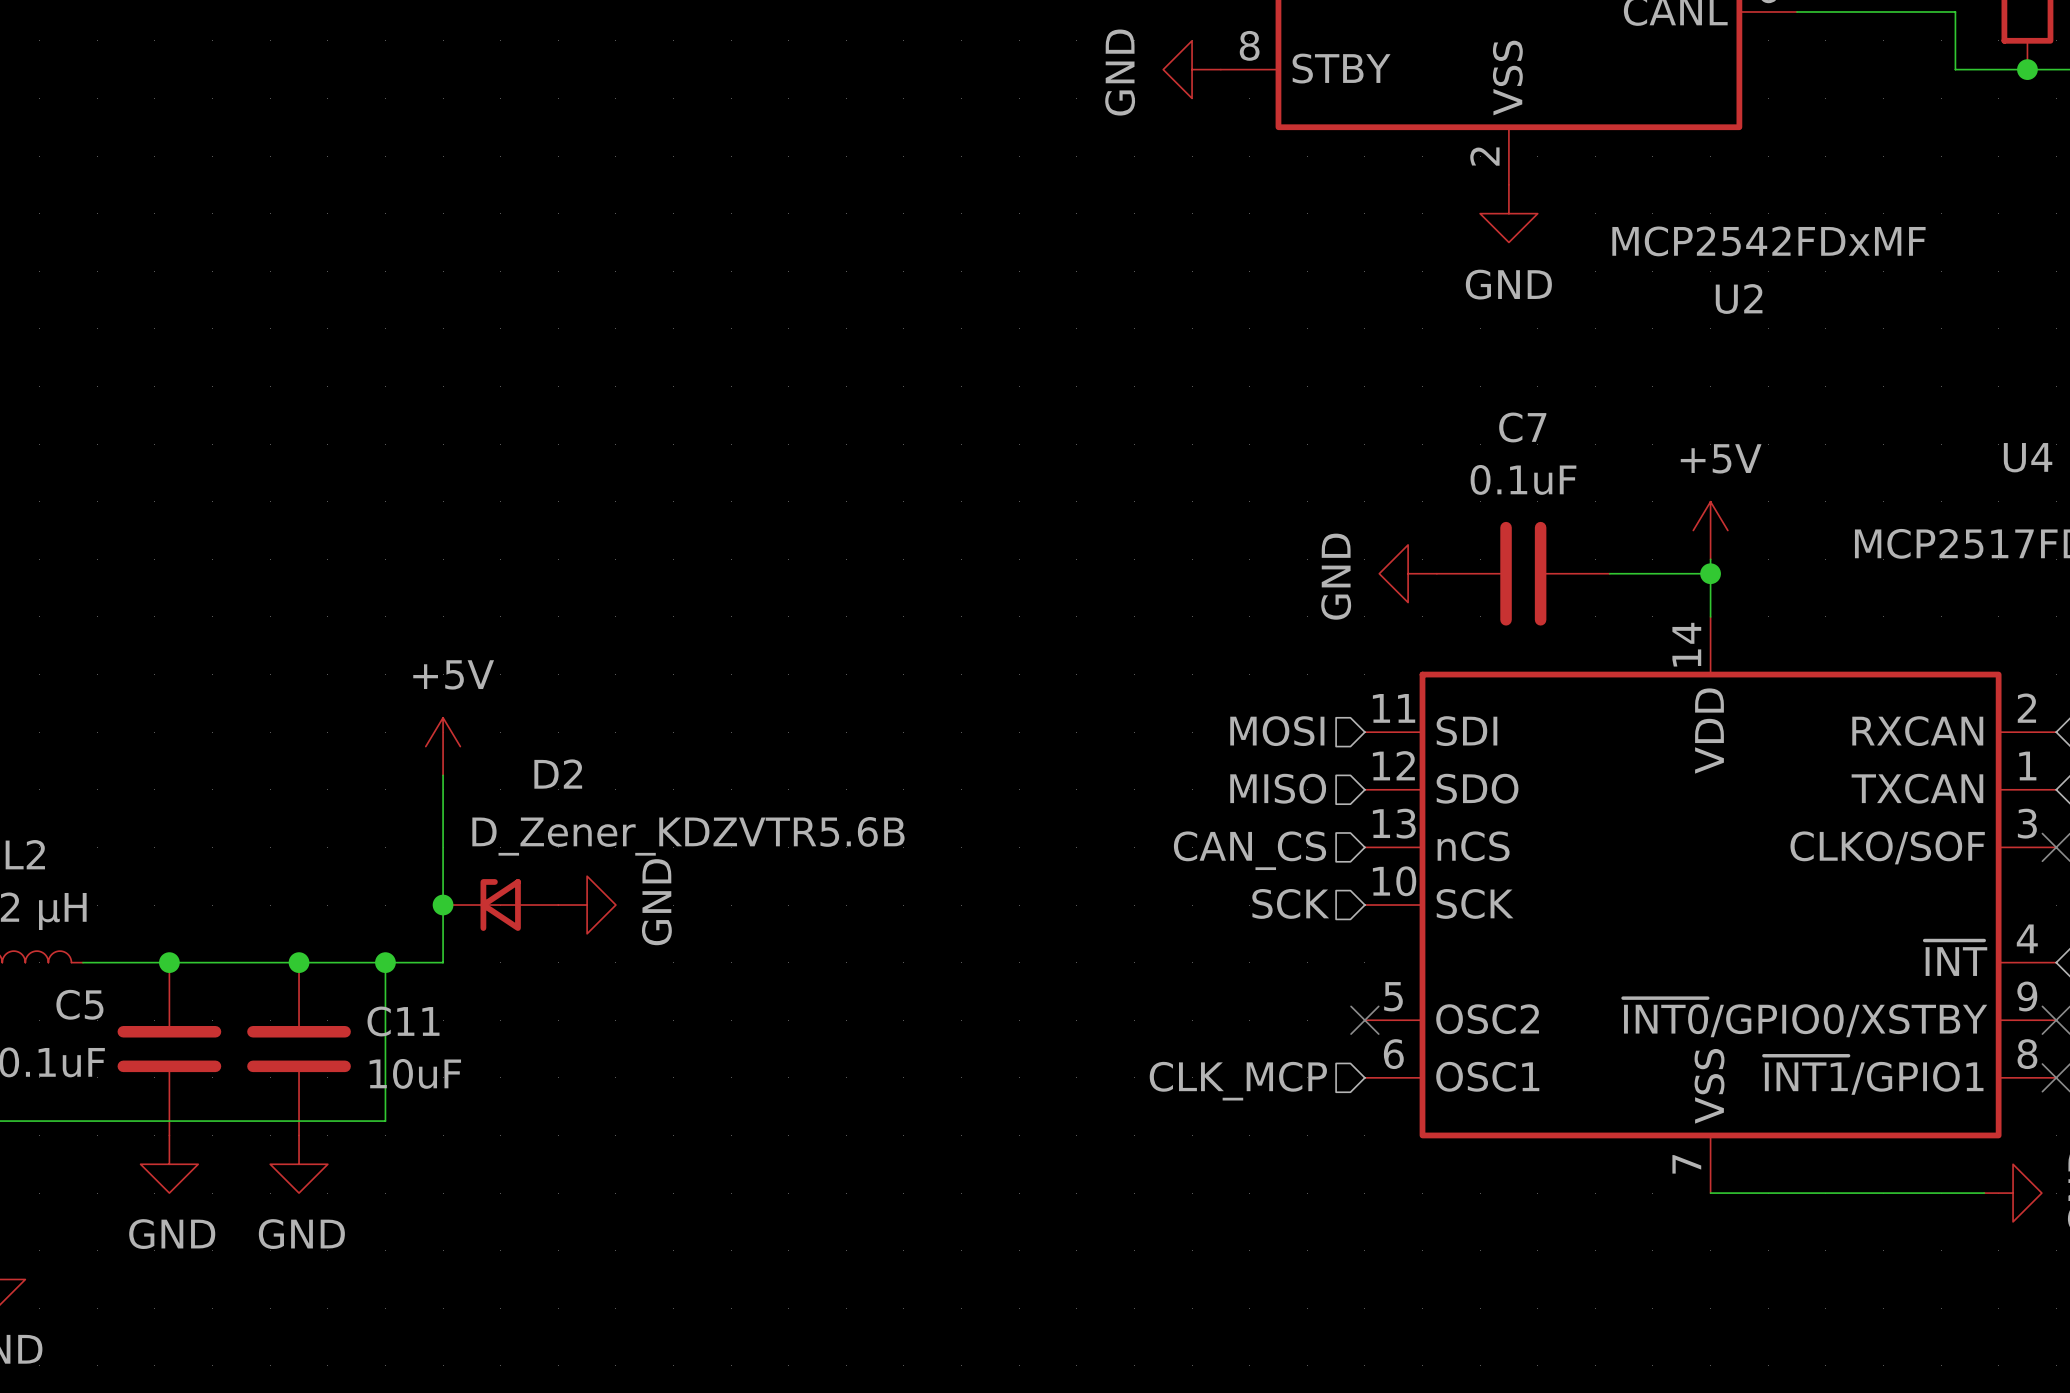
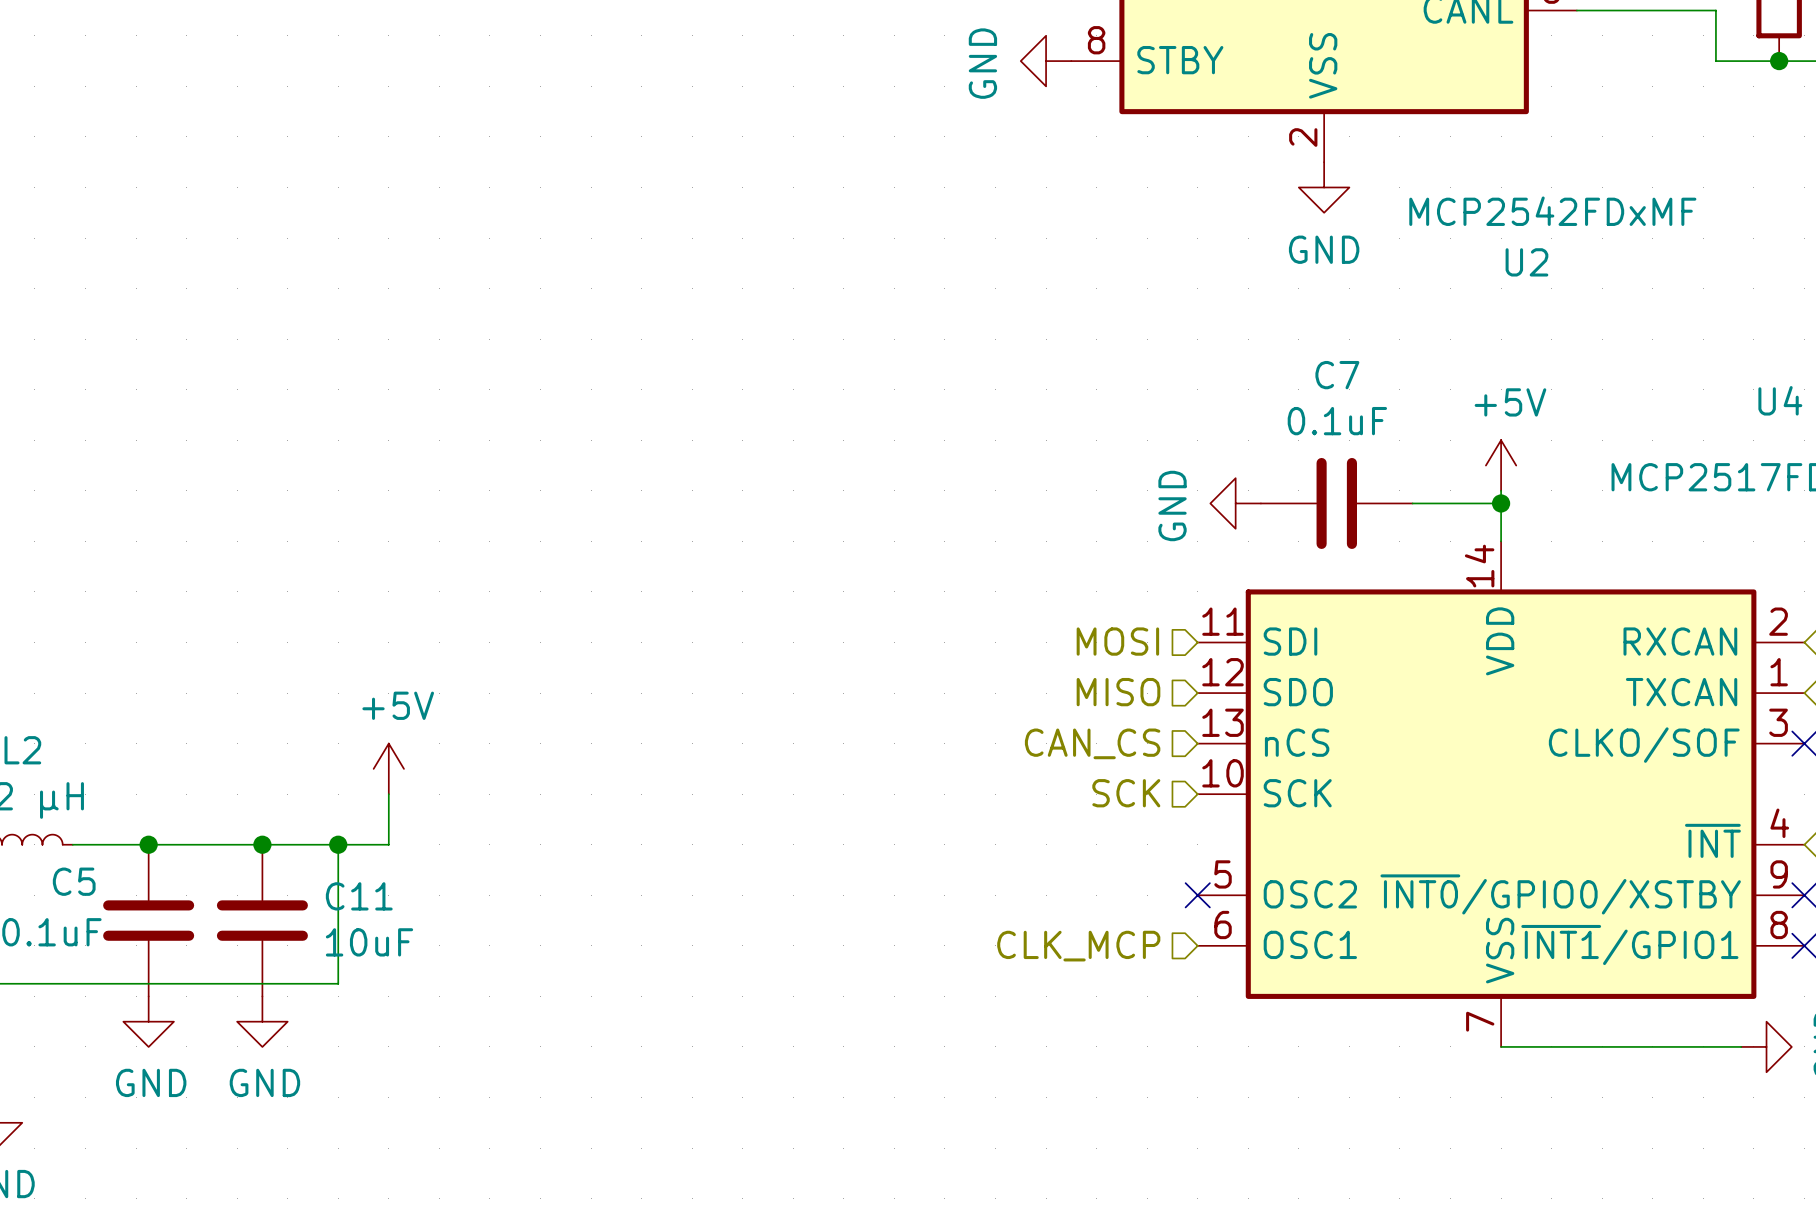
power symbol position: +5V (443, 746) -> +5V (388, 768)
wire: (443, 775) (443, 905) -> none
junction: (443, 905) -> none
D2: D_Zener_KDZVTR5.6B (500, 905) -> none
power symbol: GND (587, 905) -> none

